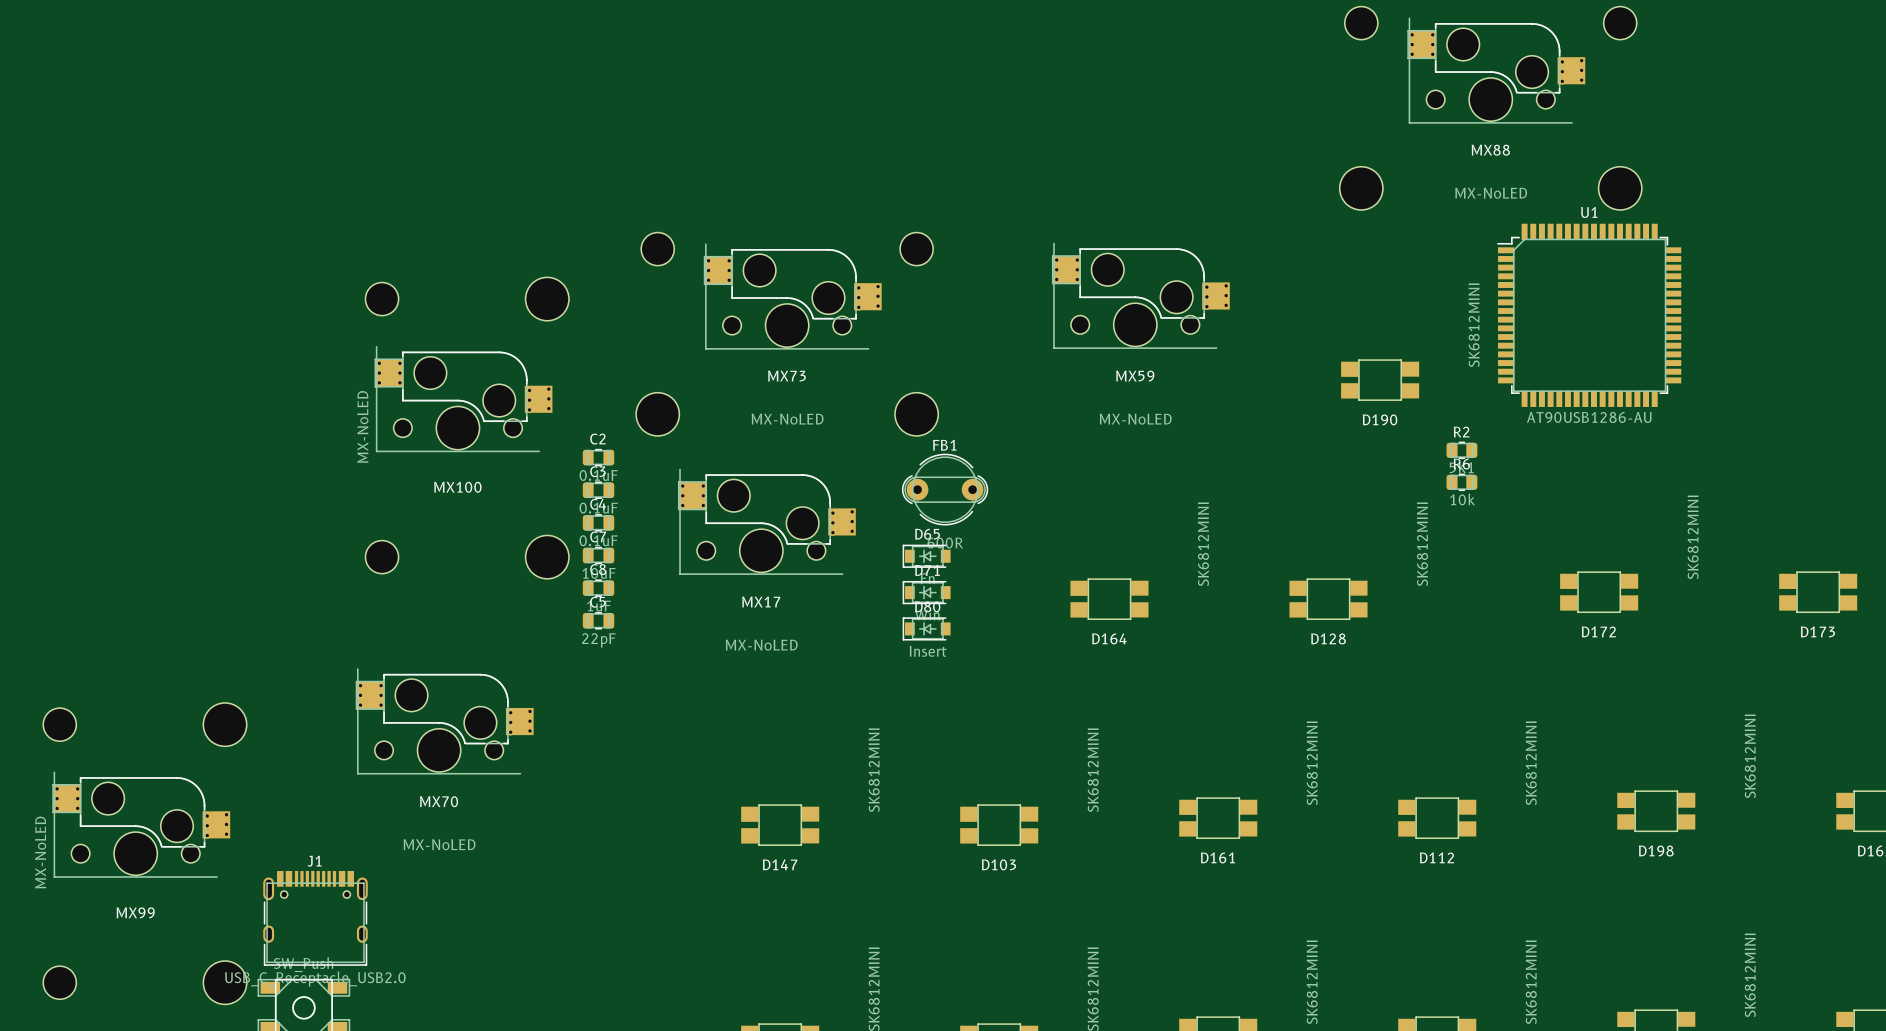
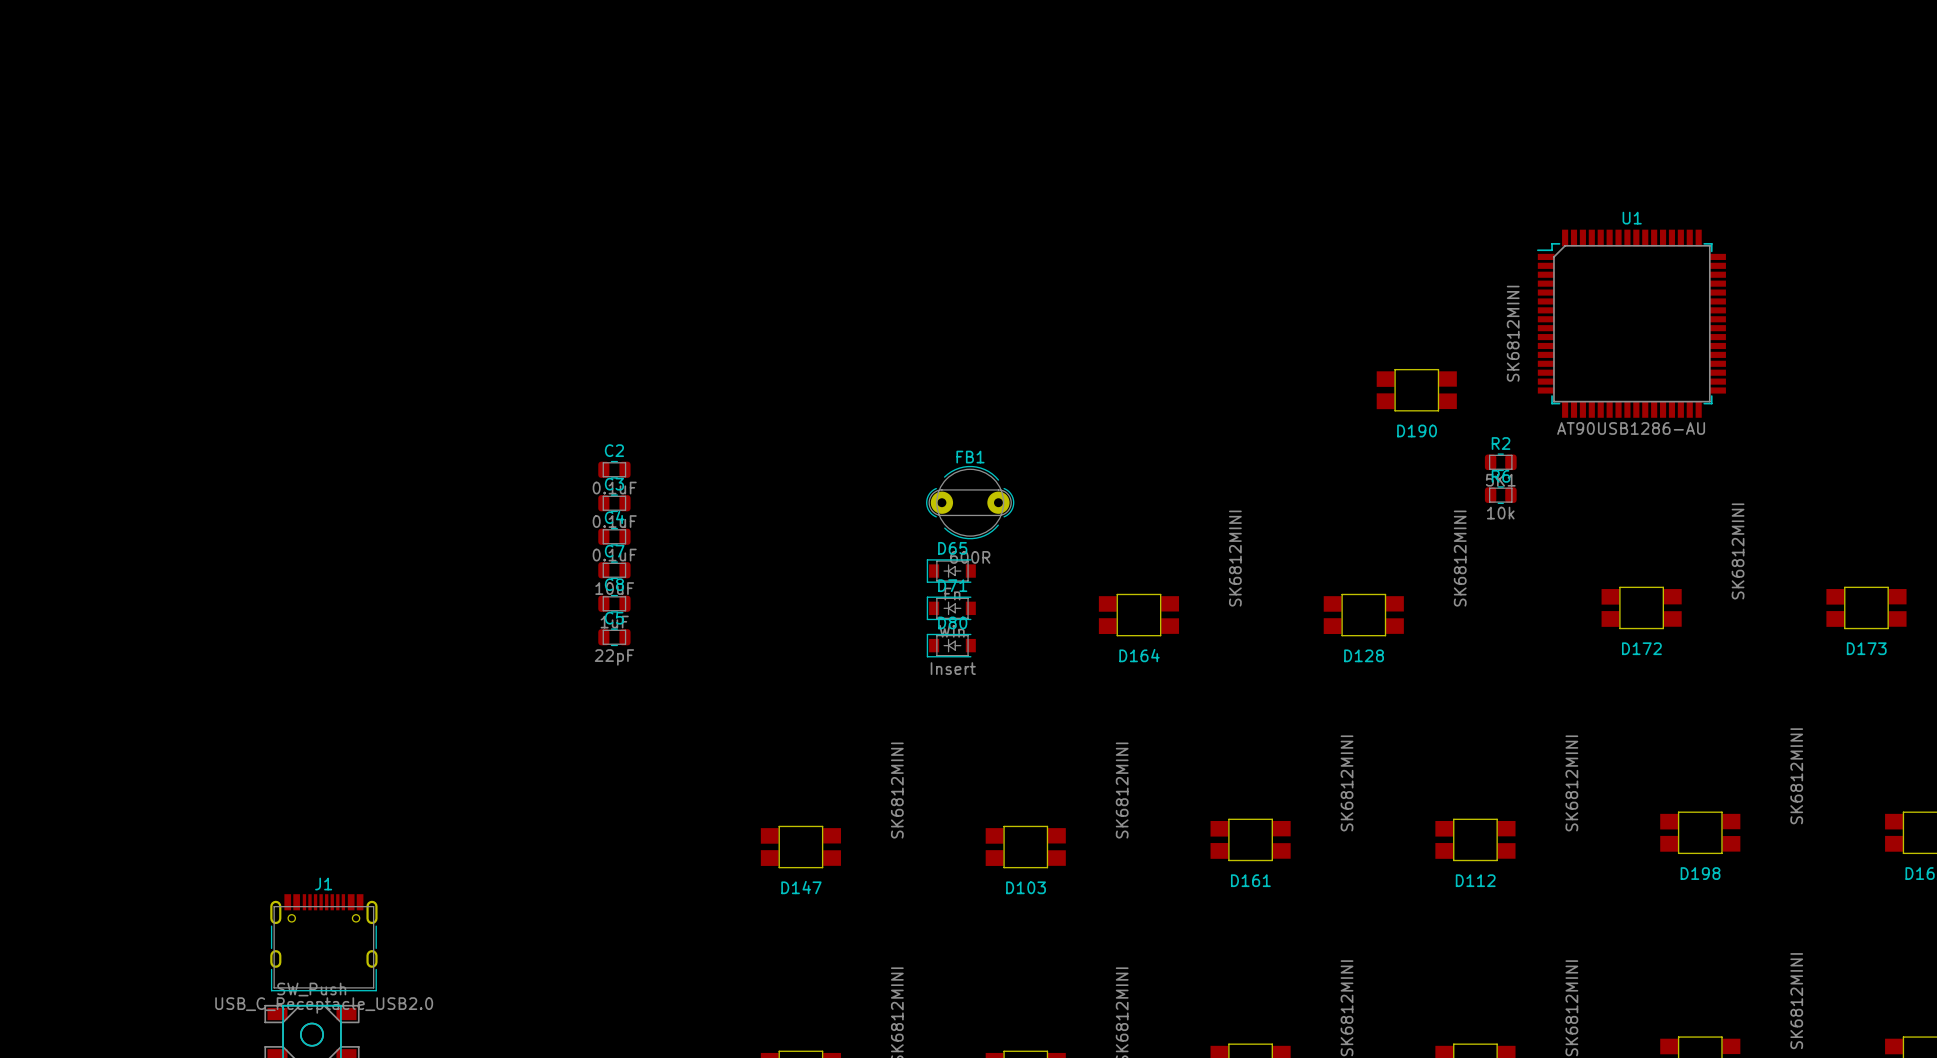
MX88: MX-NoLED (1490, 108) -> none
MX59: MX-NoLED (1140, 295) -> none
MX73: MX-NoLED (787, 334) -> none
MX100: MX-NoLED (467, 428) -> none
MX17: MX-NoLED (766, 521) -> none
MX70: MX-NoLED (444, 721) -> none
MX99: MX-NoLED (144, 853) -> none

